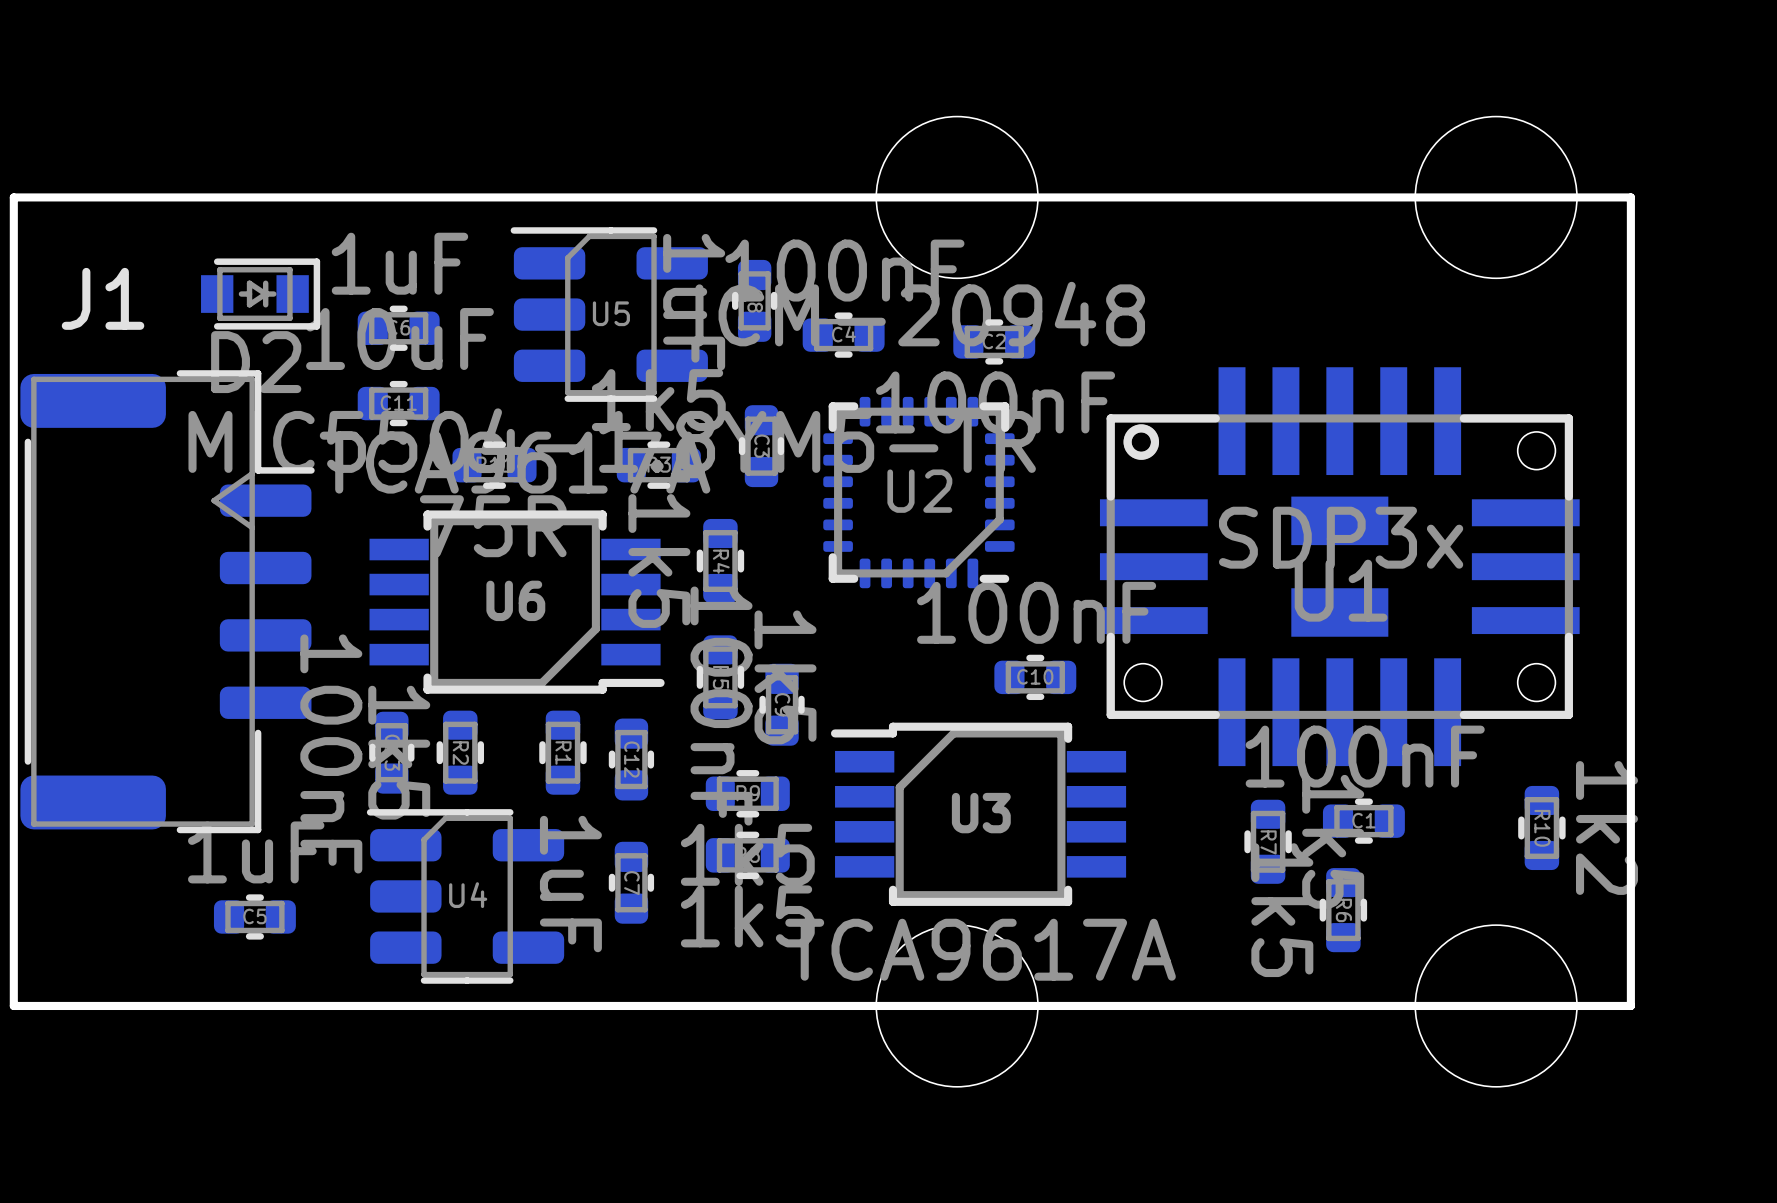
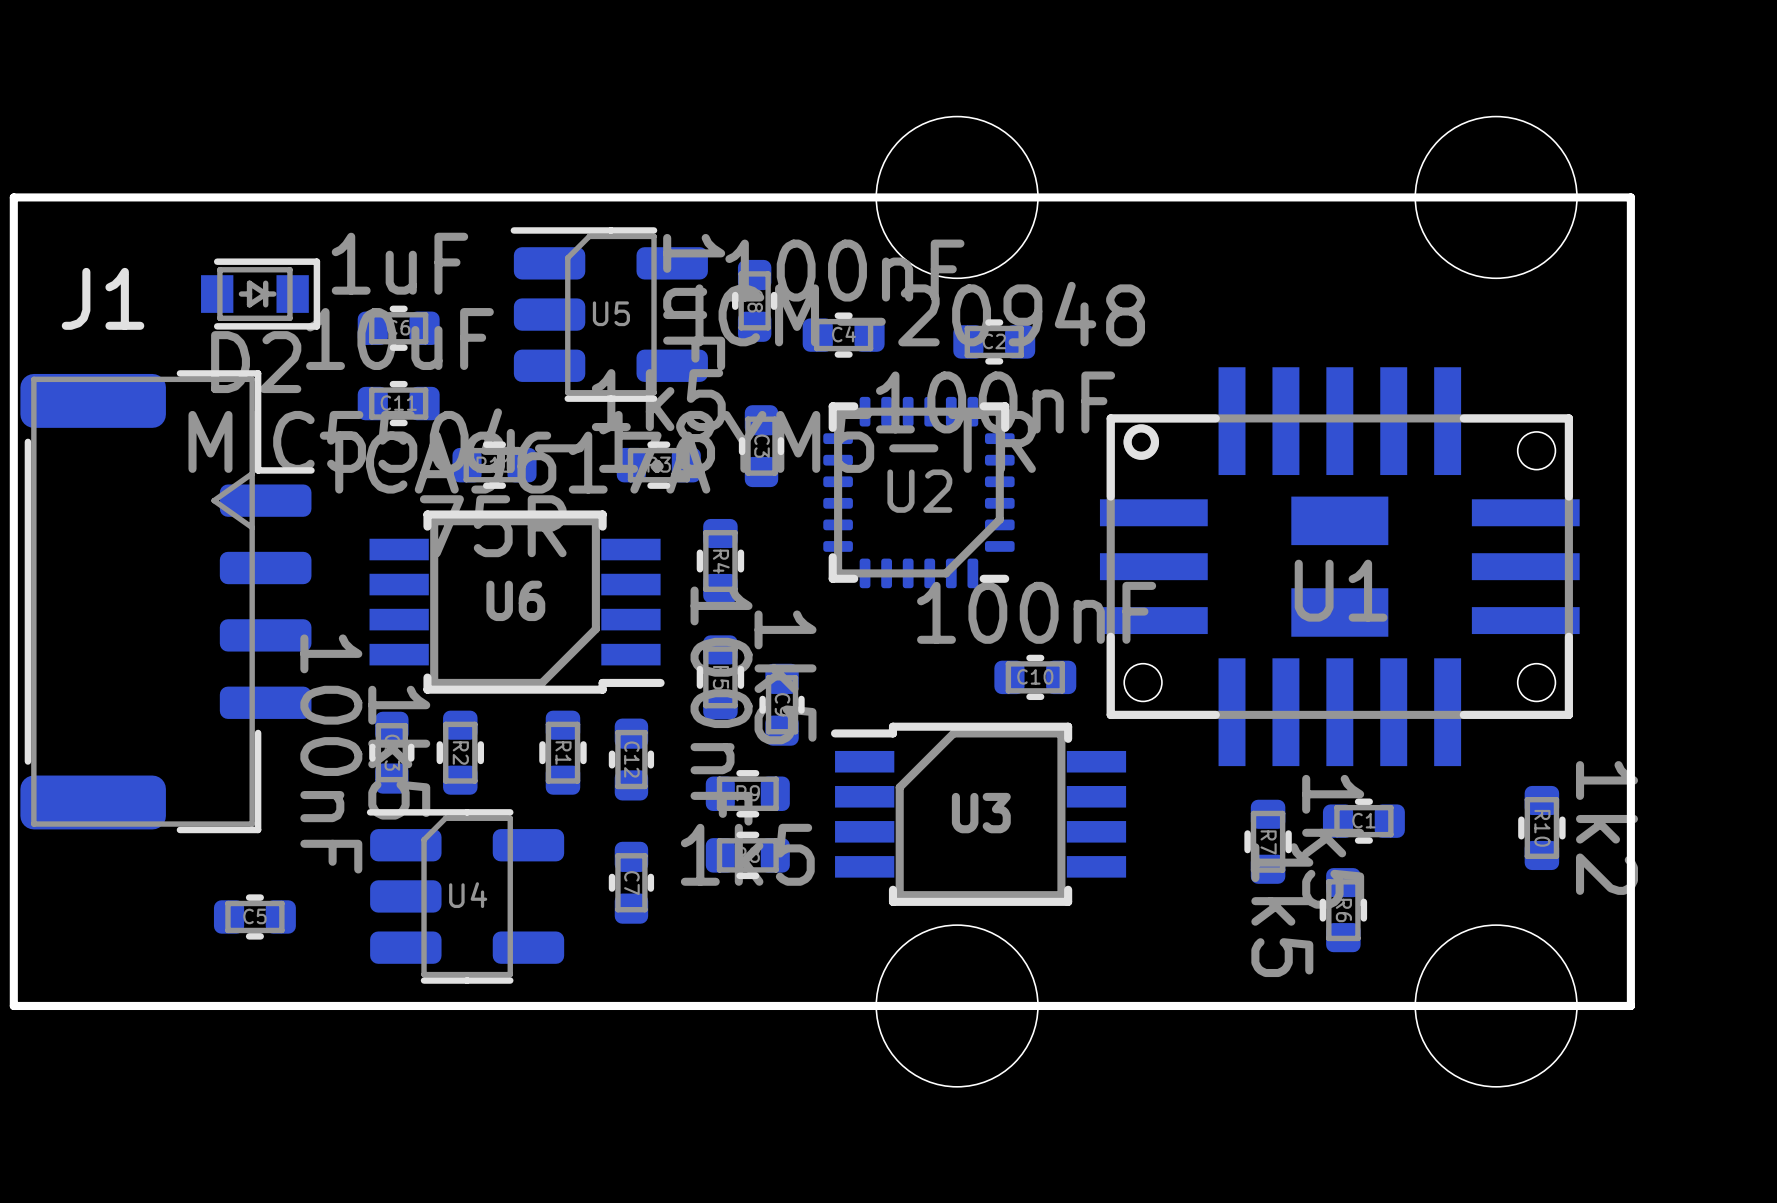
U1 value: SDP3x (1341, 537) -> none
R4 value: 1k5 (659, 561) -> none
C1 value: 100nF (1365, 756) -> none
C5 value: 1uF (256, 852) -> none
C7 value: 1uF (570, 884) -> none
part value: 1k5 (747, 916) -> none
U3 value: TCA9617A (980, 949) -> none

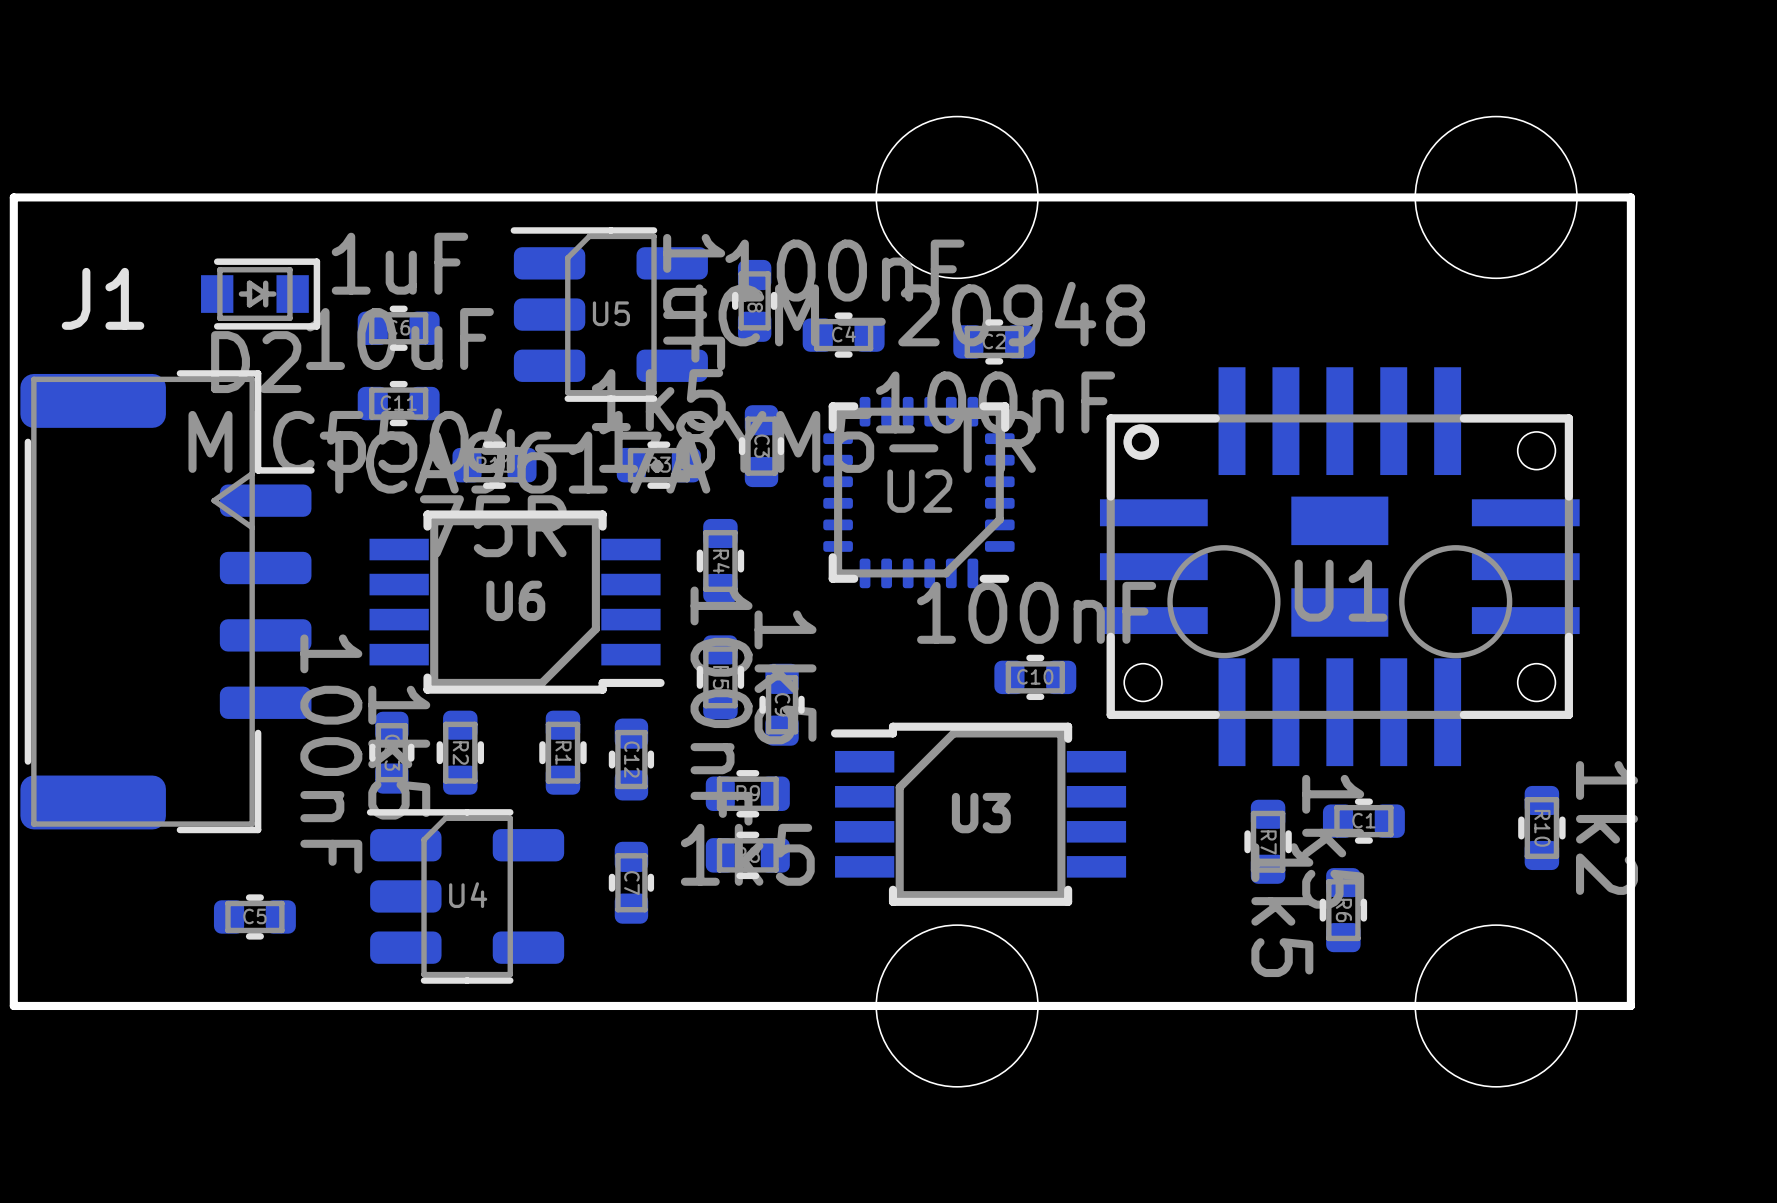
U1 footprint: [1099, 367, 1580, 767] -> [1099, 367, 1580, 767]

